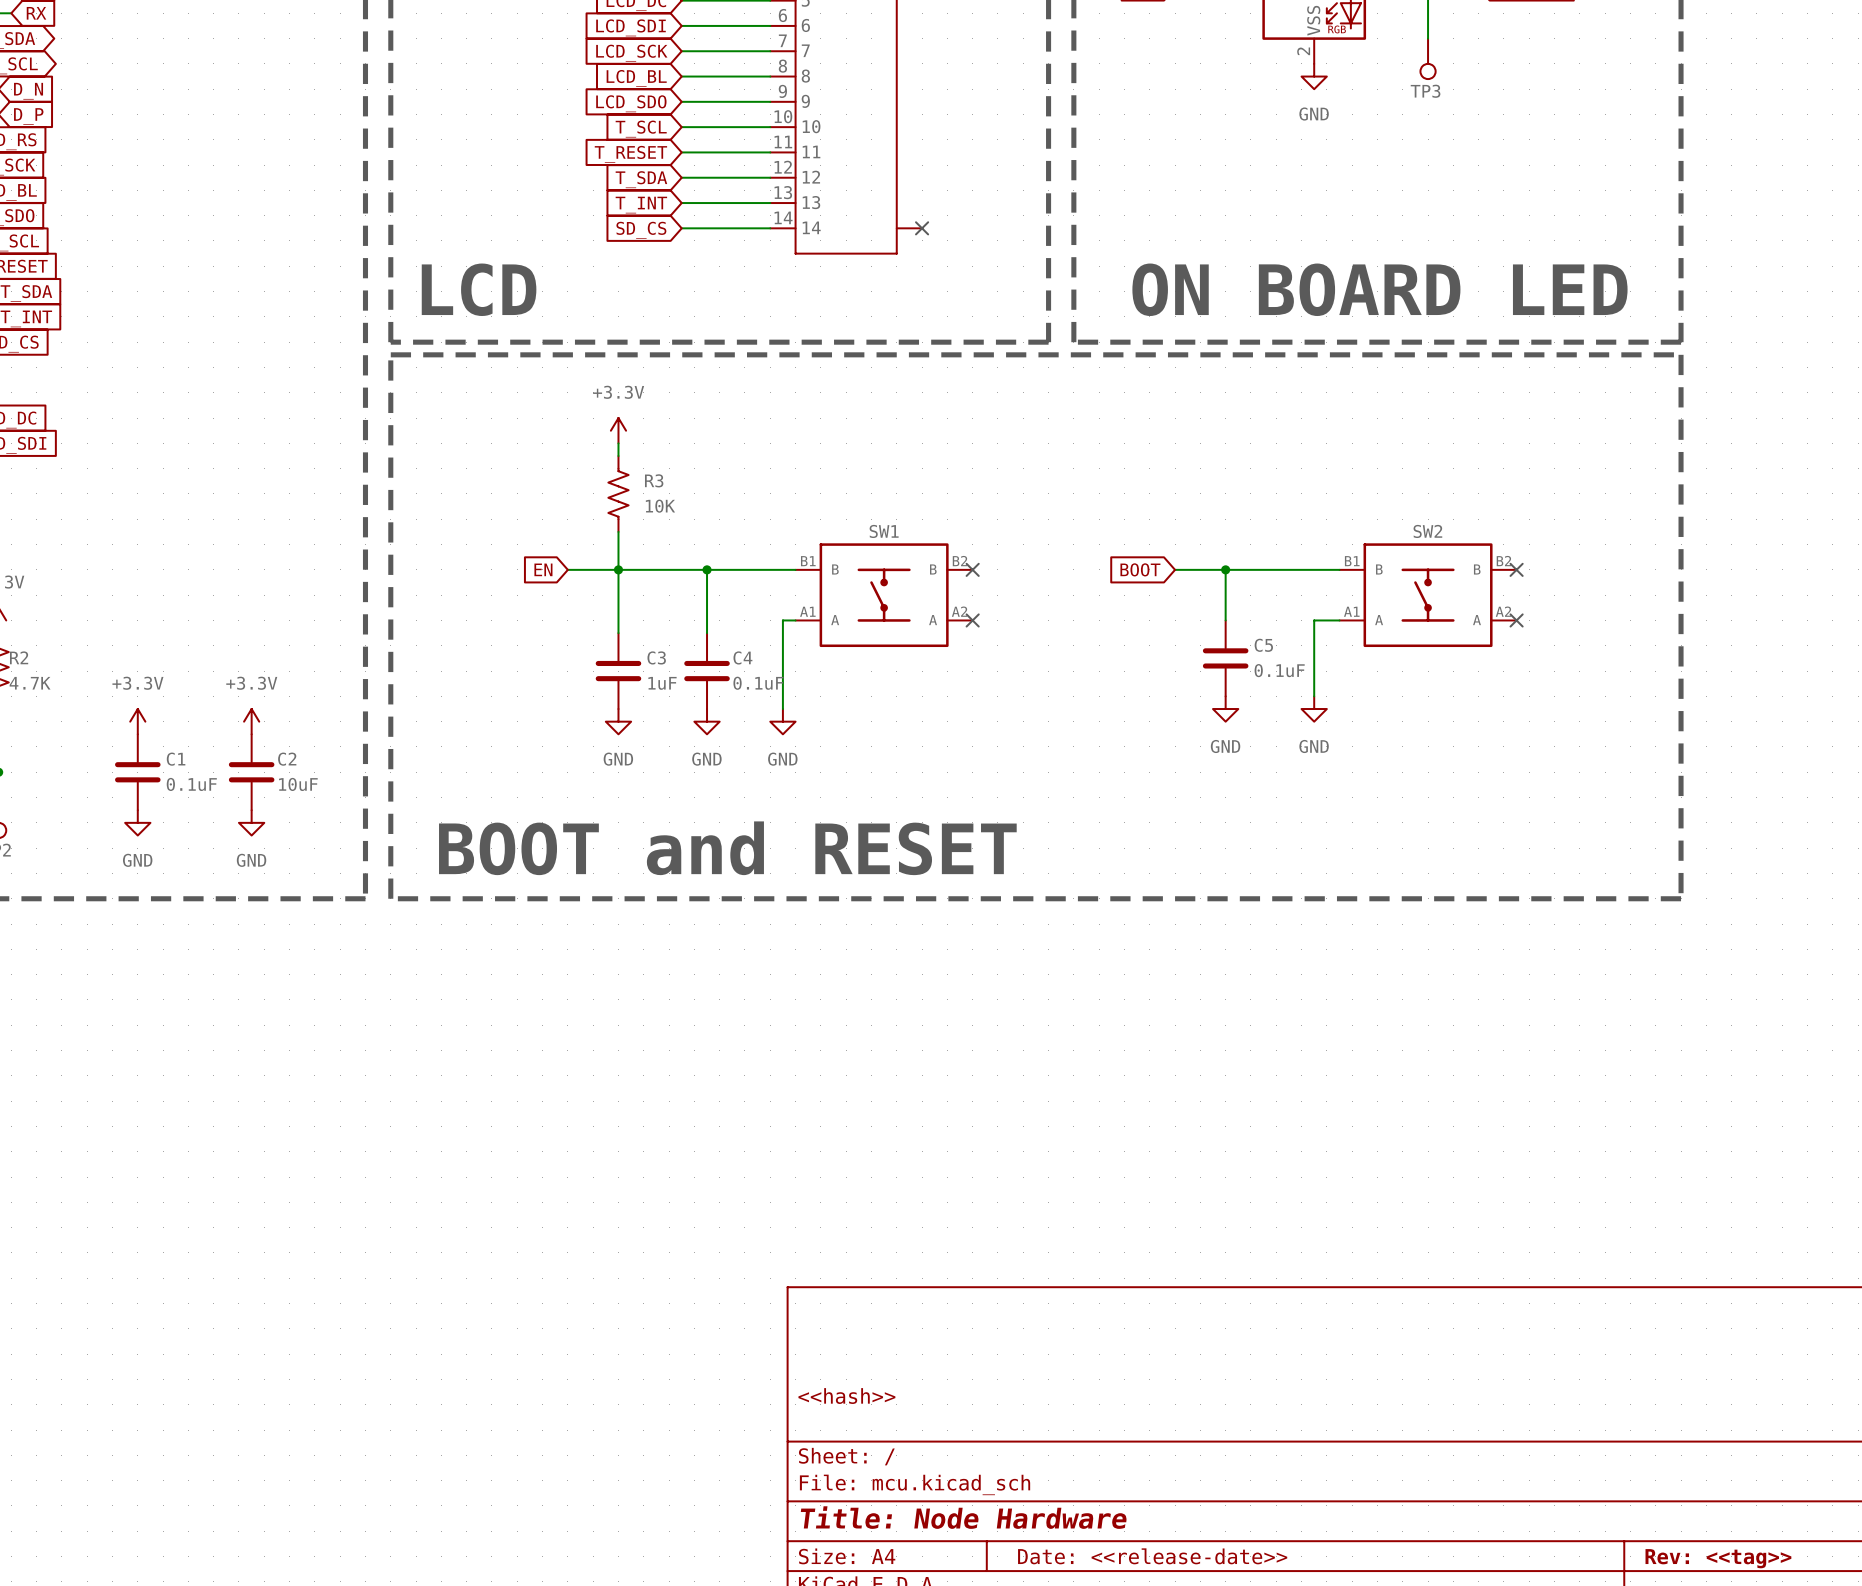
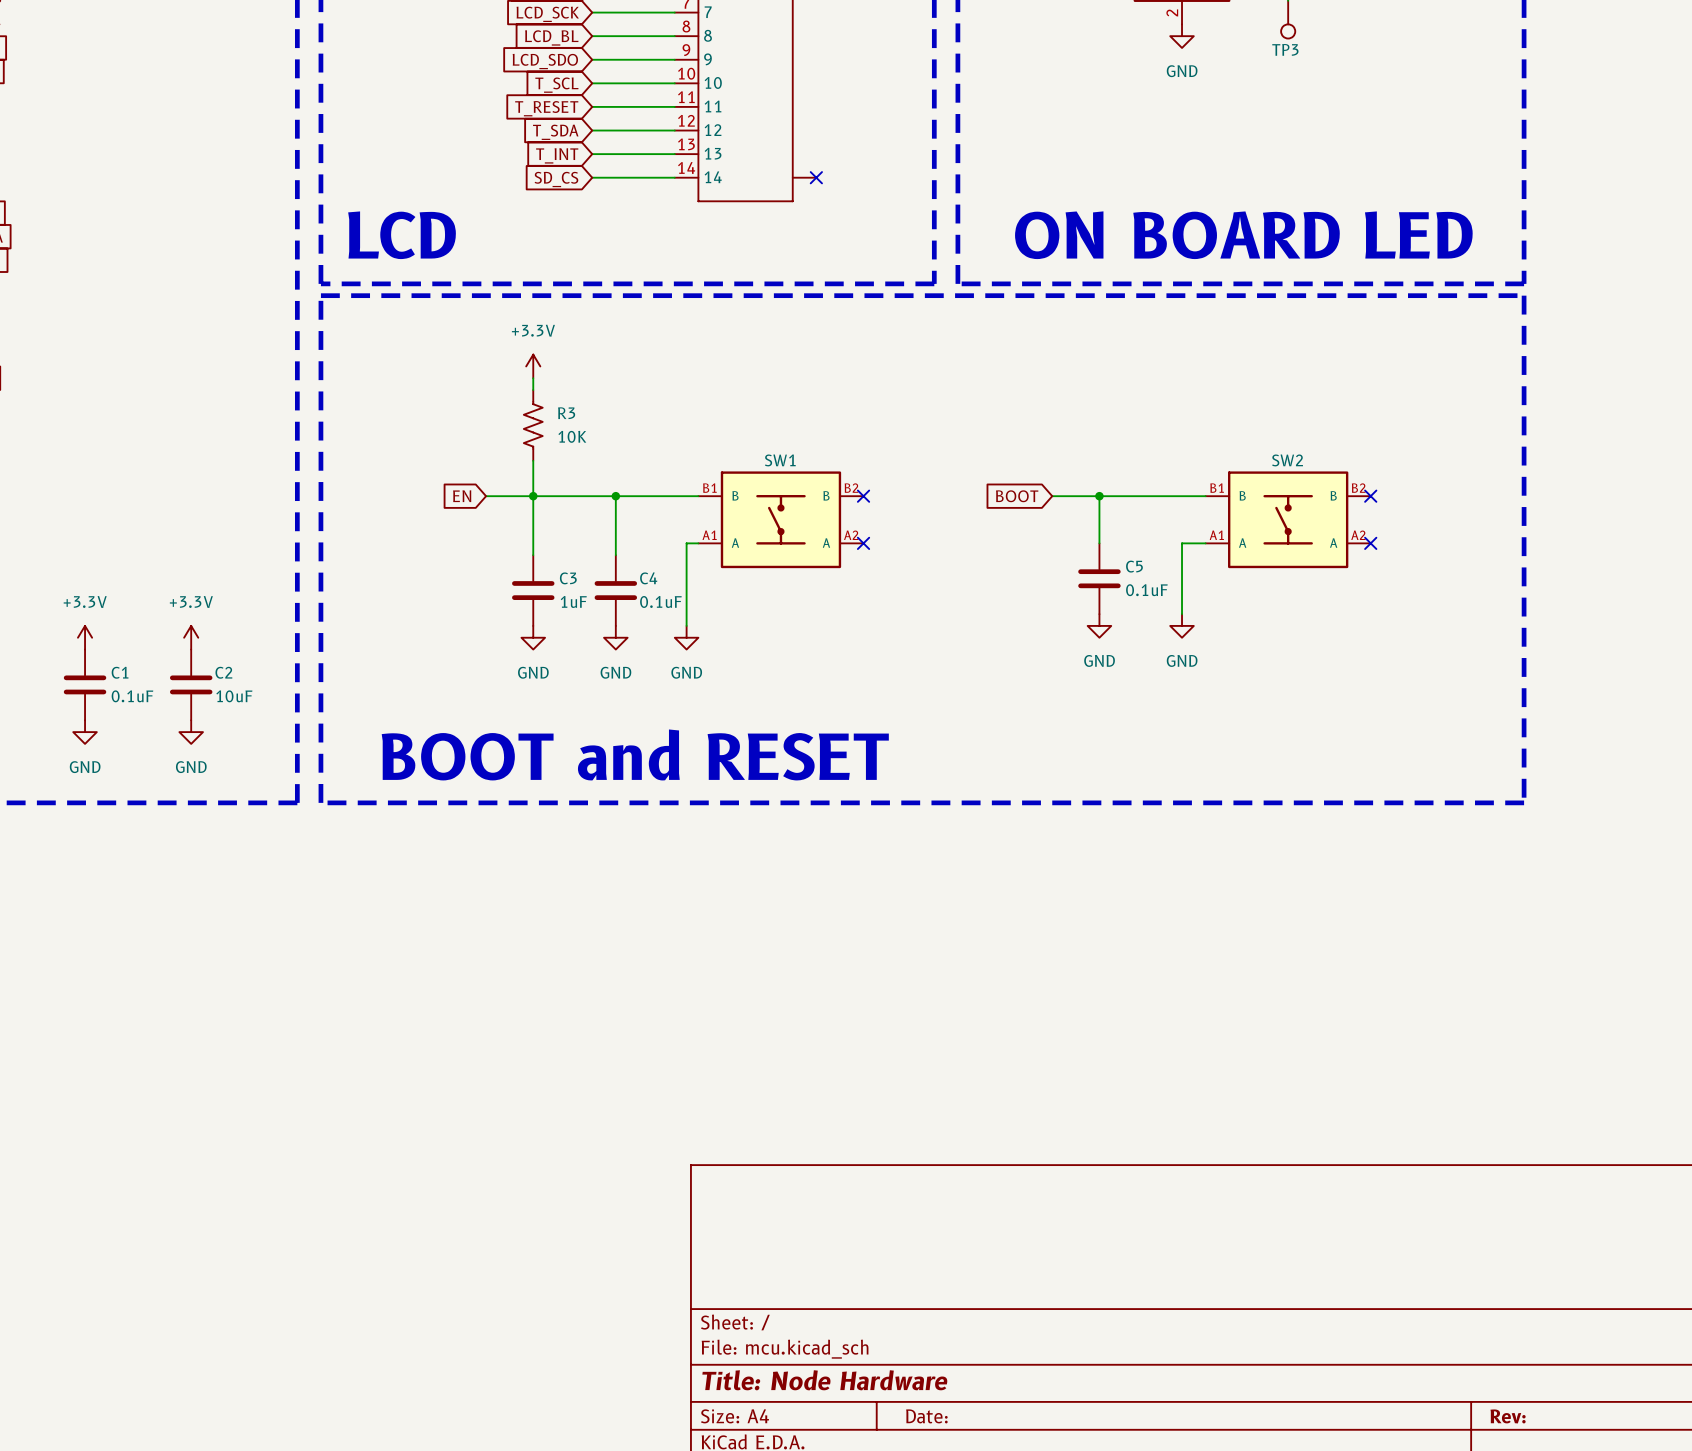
title block: <<hash>> (846, 1396) -> none
title block: Date: <<release-date>> (1152, 1556) -> Date: (926, 1416)
title block: Rev: <<tag>> (1718, 1558) -> Rev: (1508, 1416)

